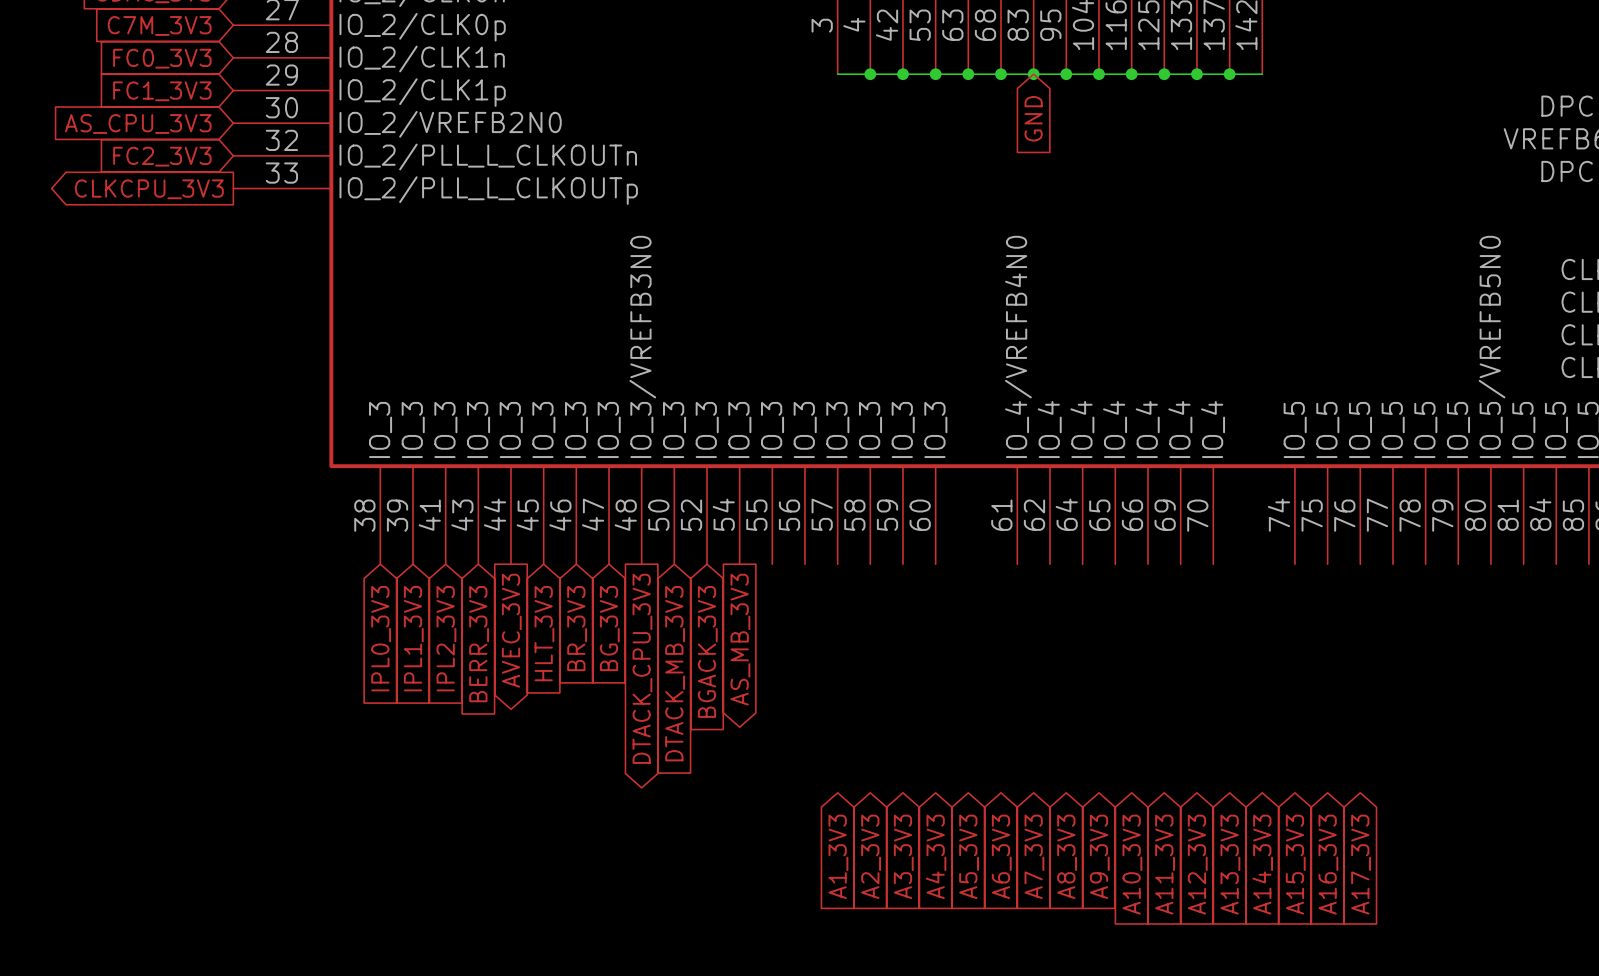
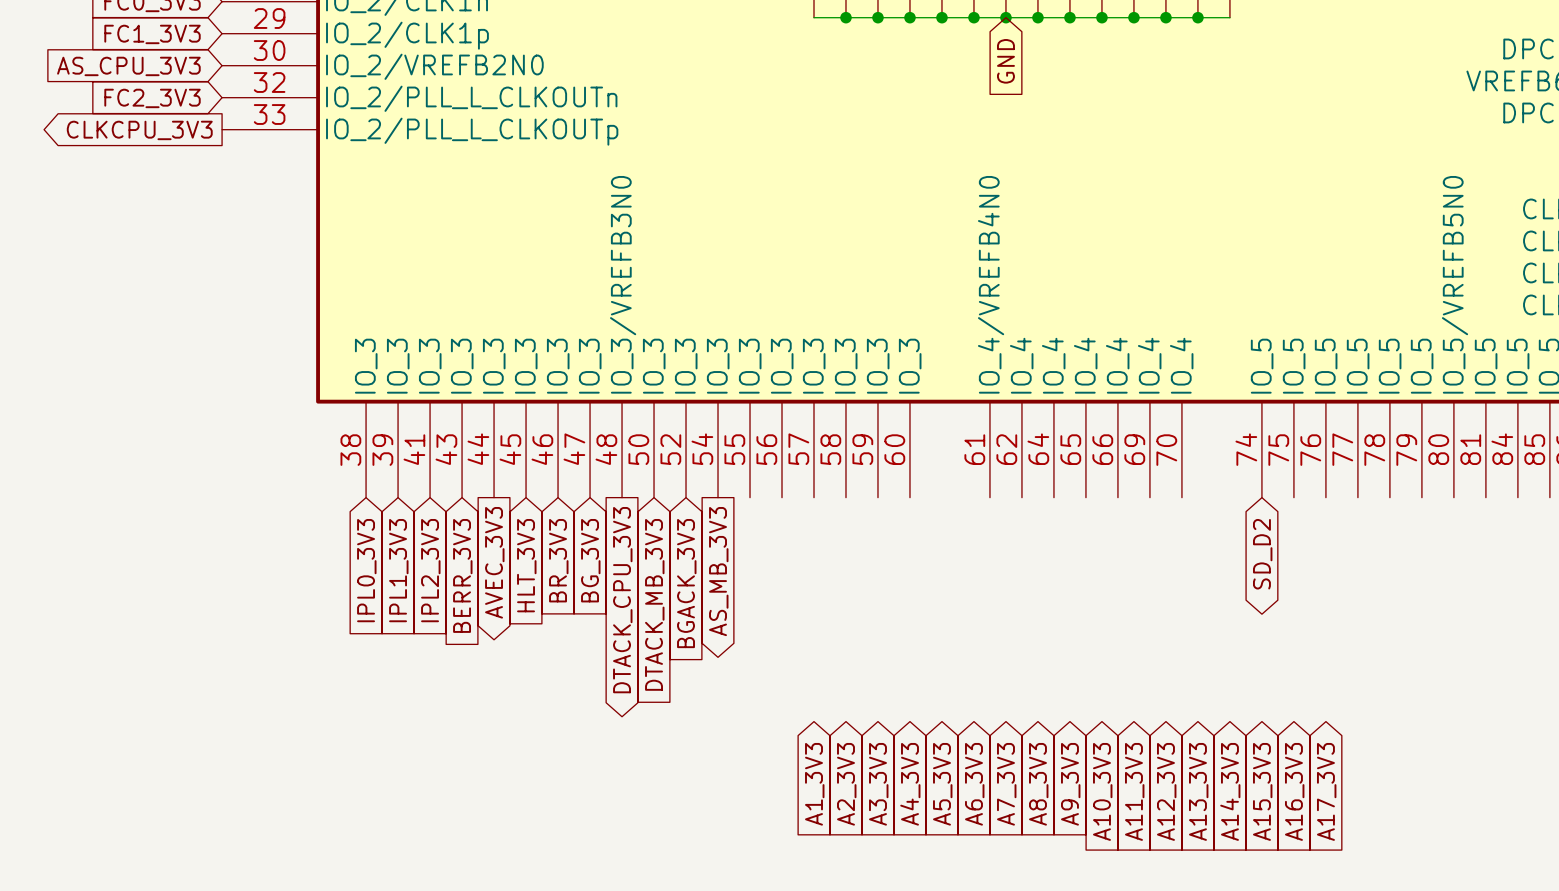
global label: none -> SD_D2 (1262, 554)

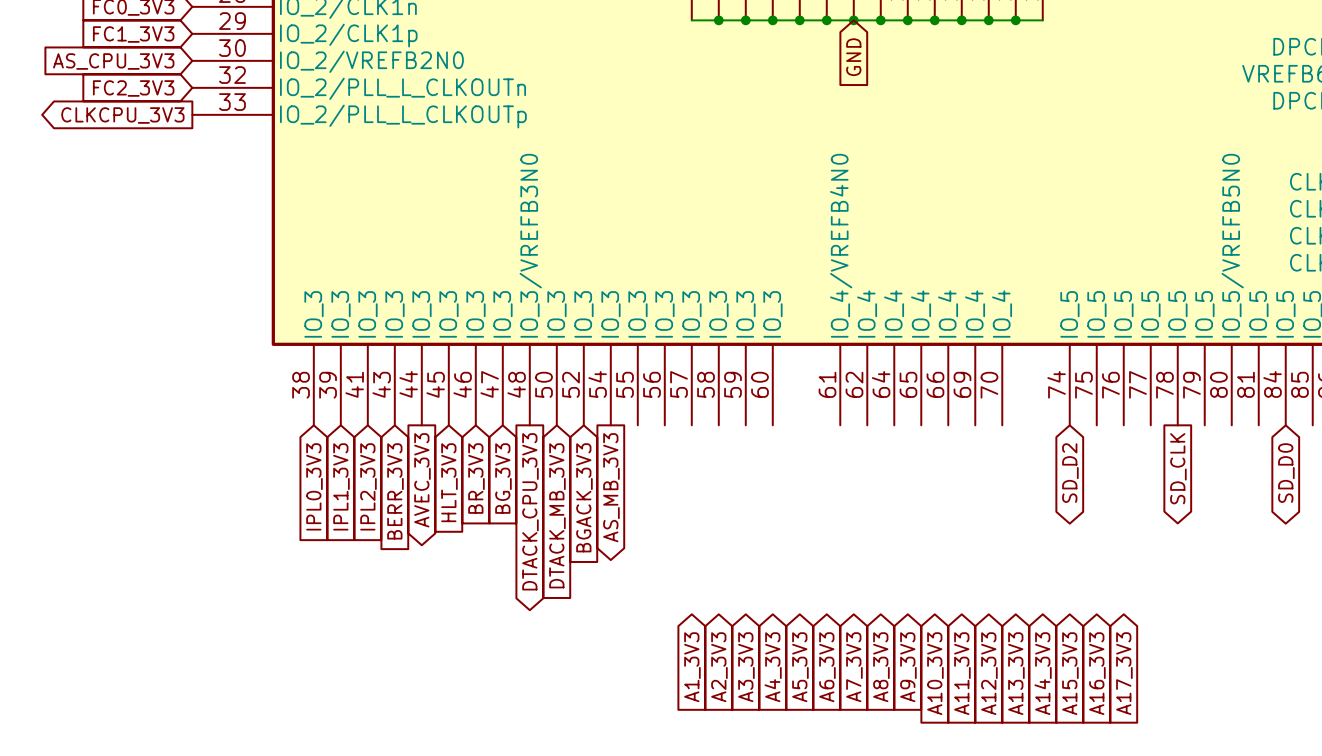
global label: none -> SD_CLK (1178, 468)
global label: none -> SD_D0 (1286, 473)

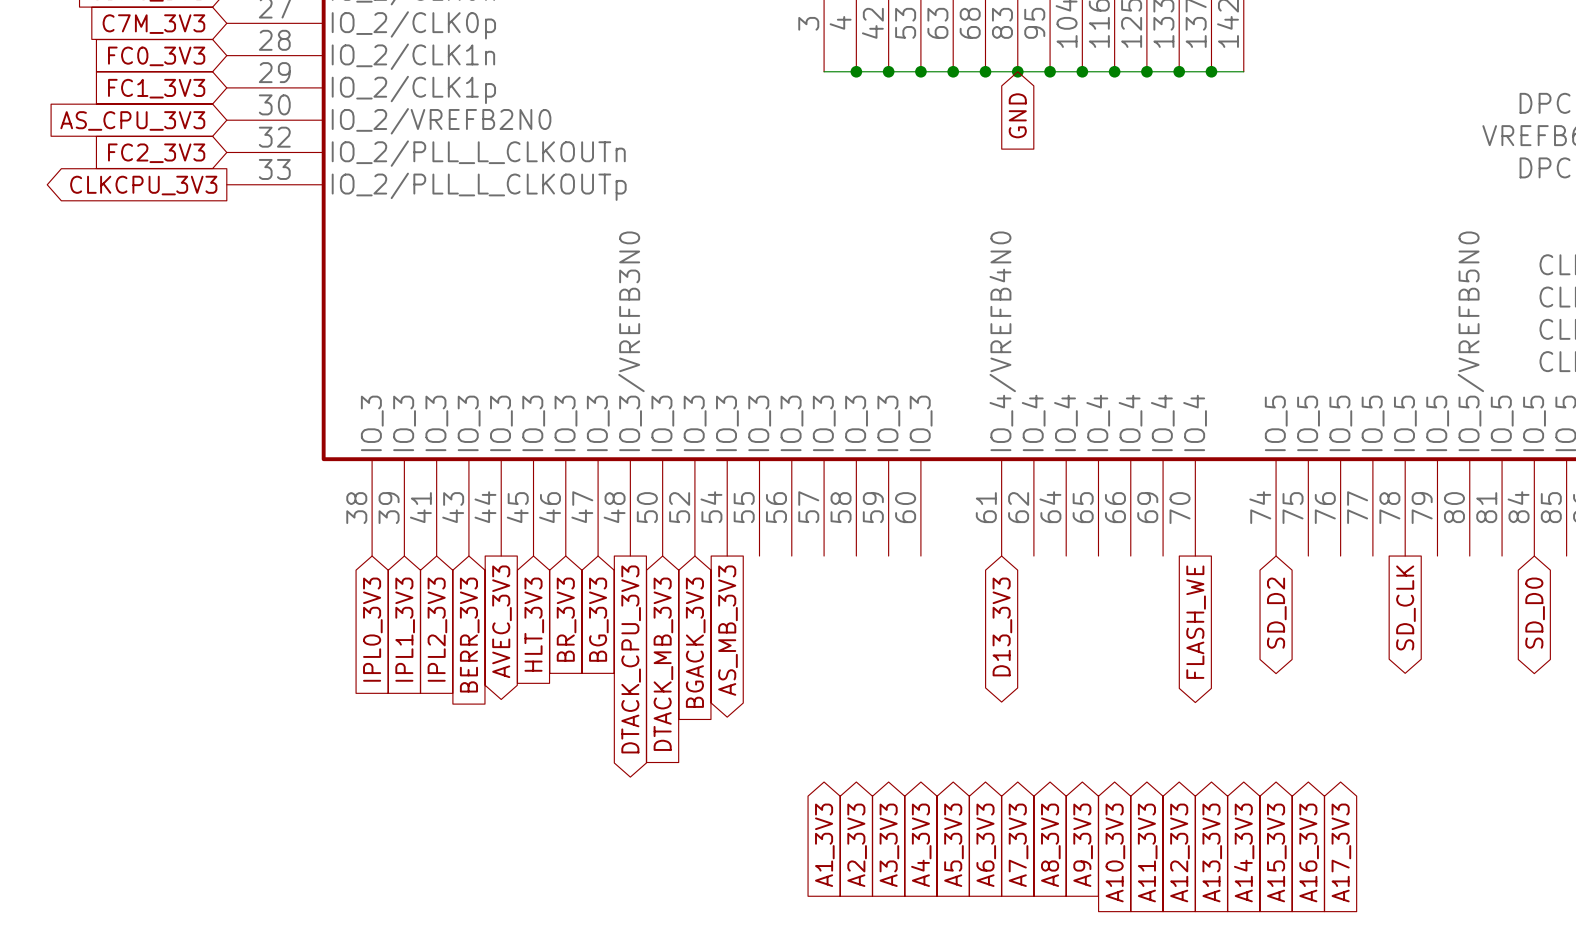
global label: none -> FLASH_WE (1196, 622)
global label: none -> D13_3V3 (1002, 626)

